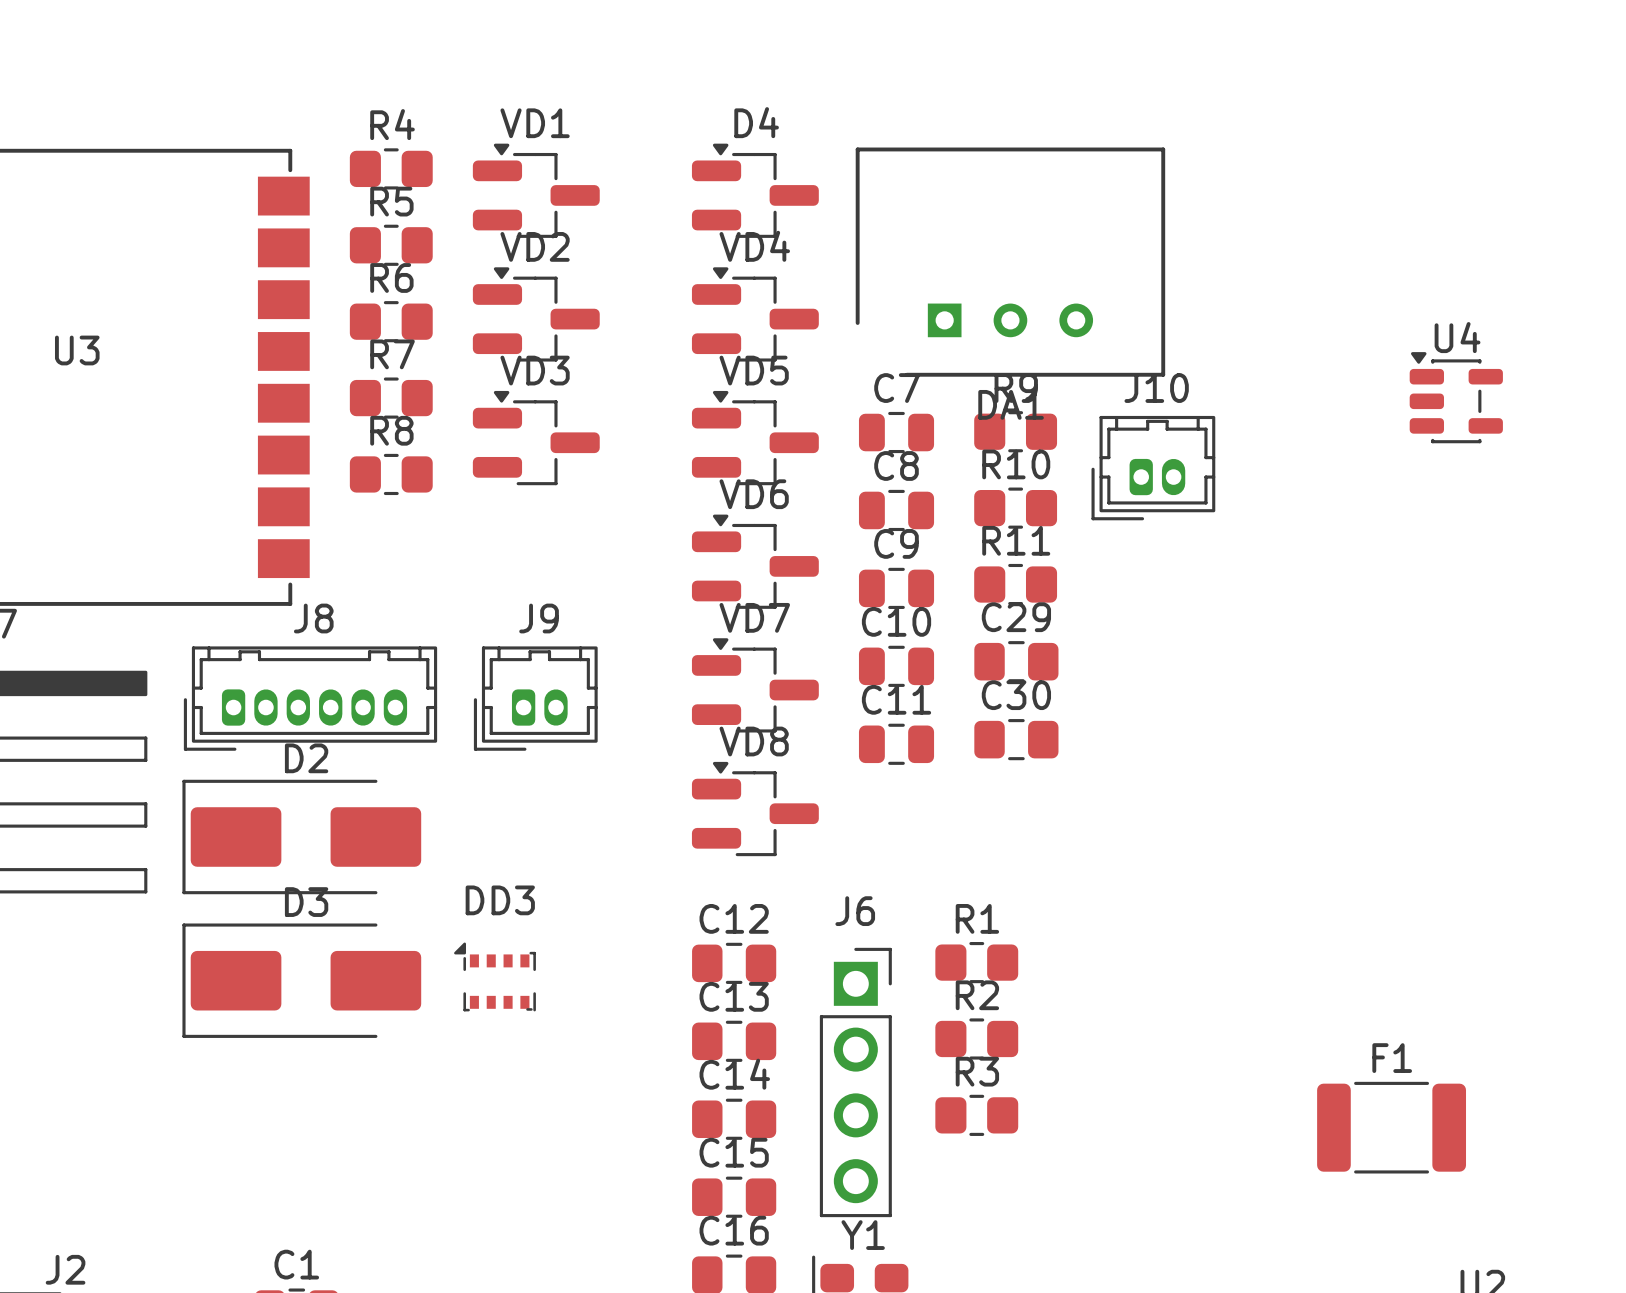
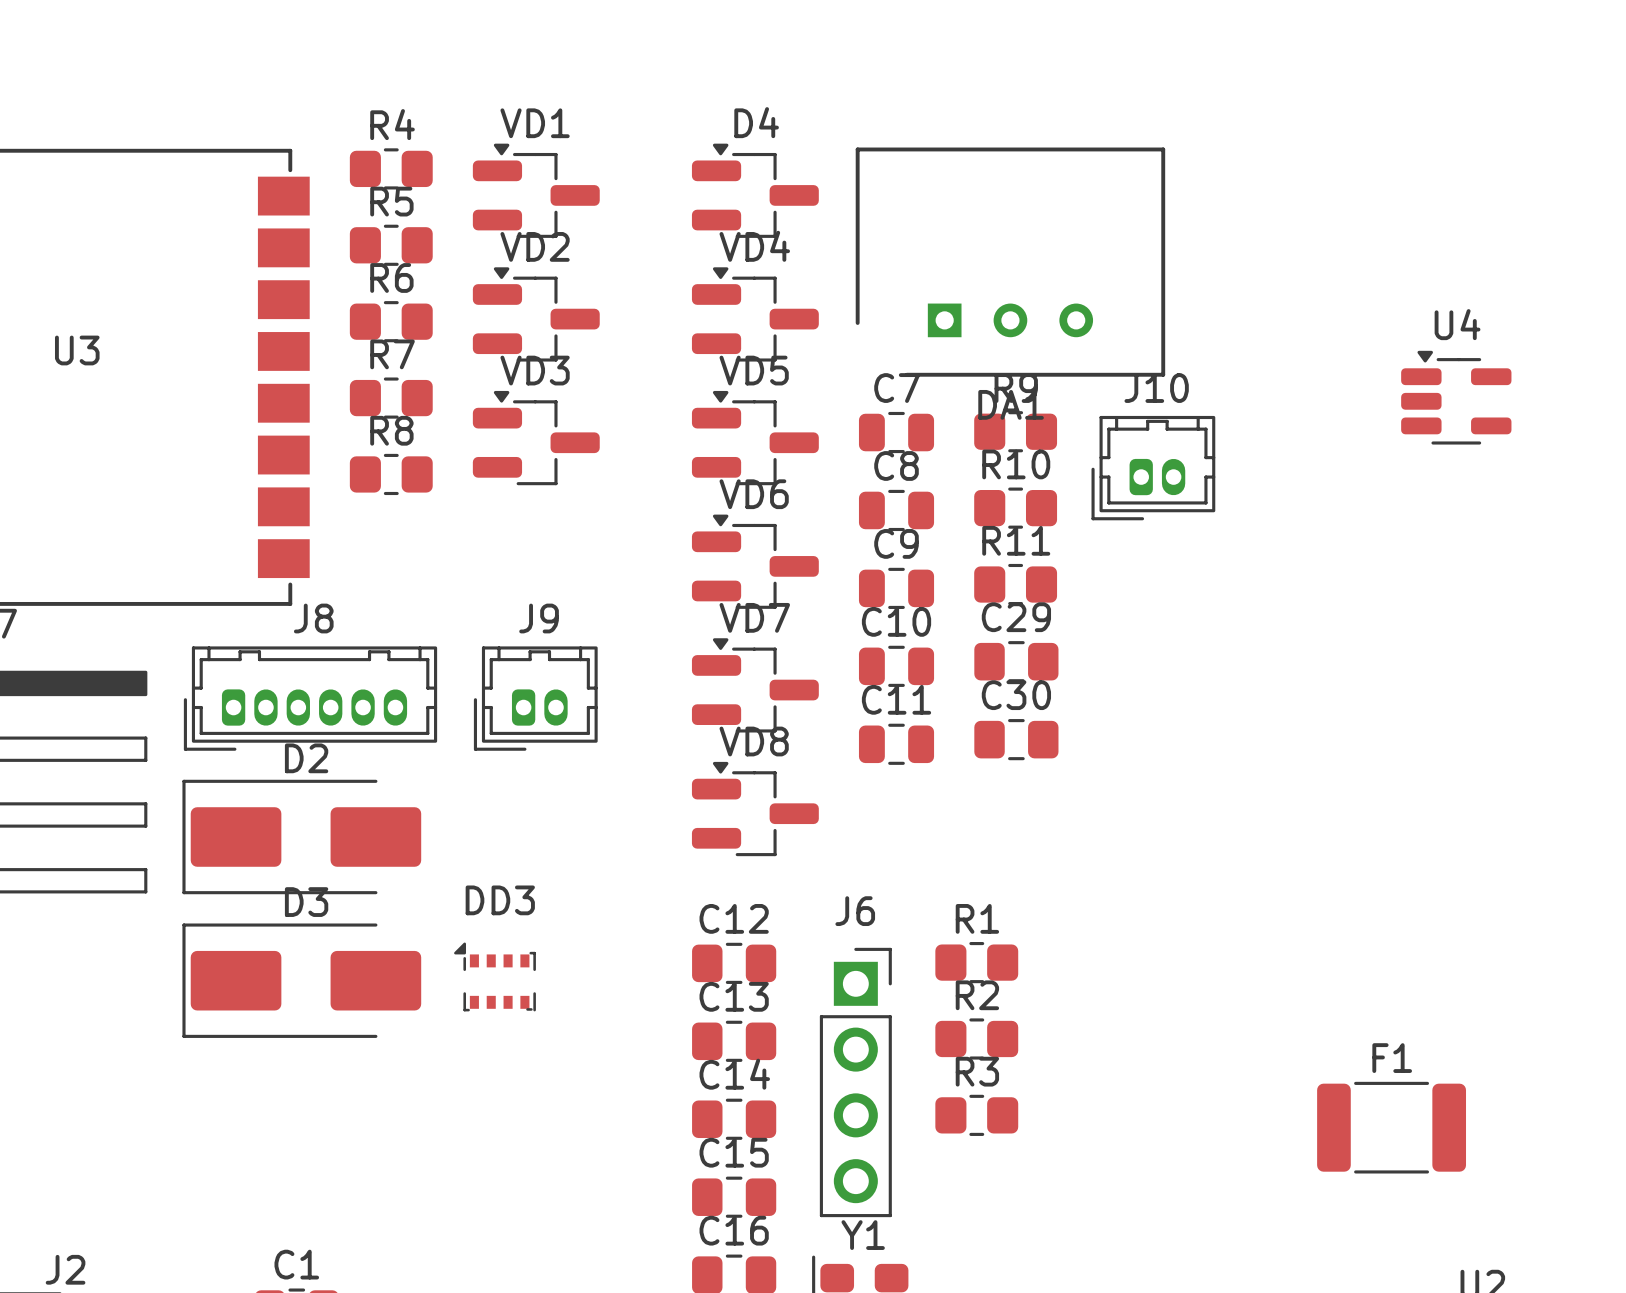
U4 footprint: [1409, 352, 1503, 444] -> [1401, 350, 1512, 445]

